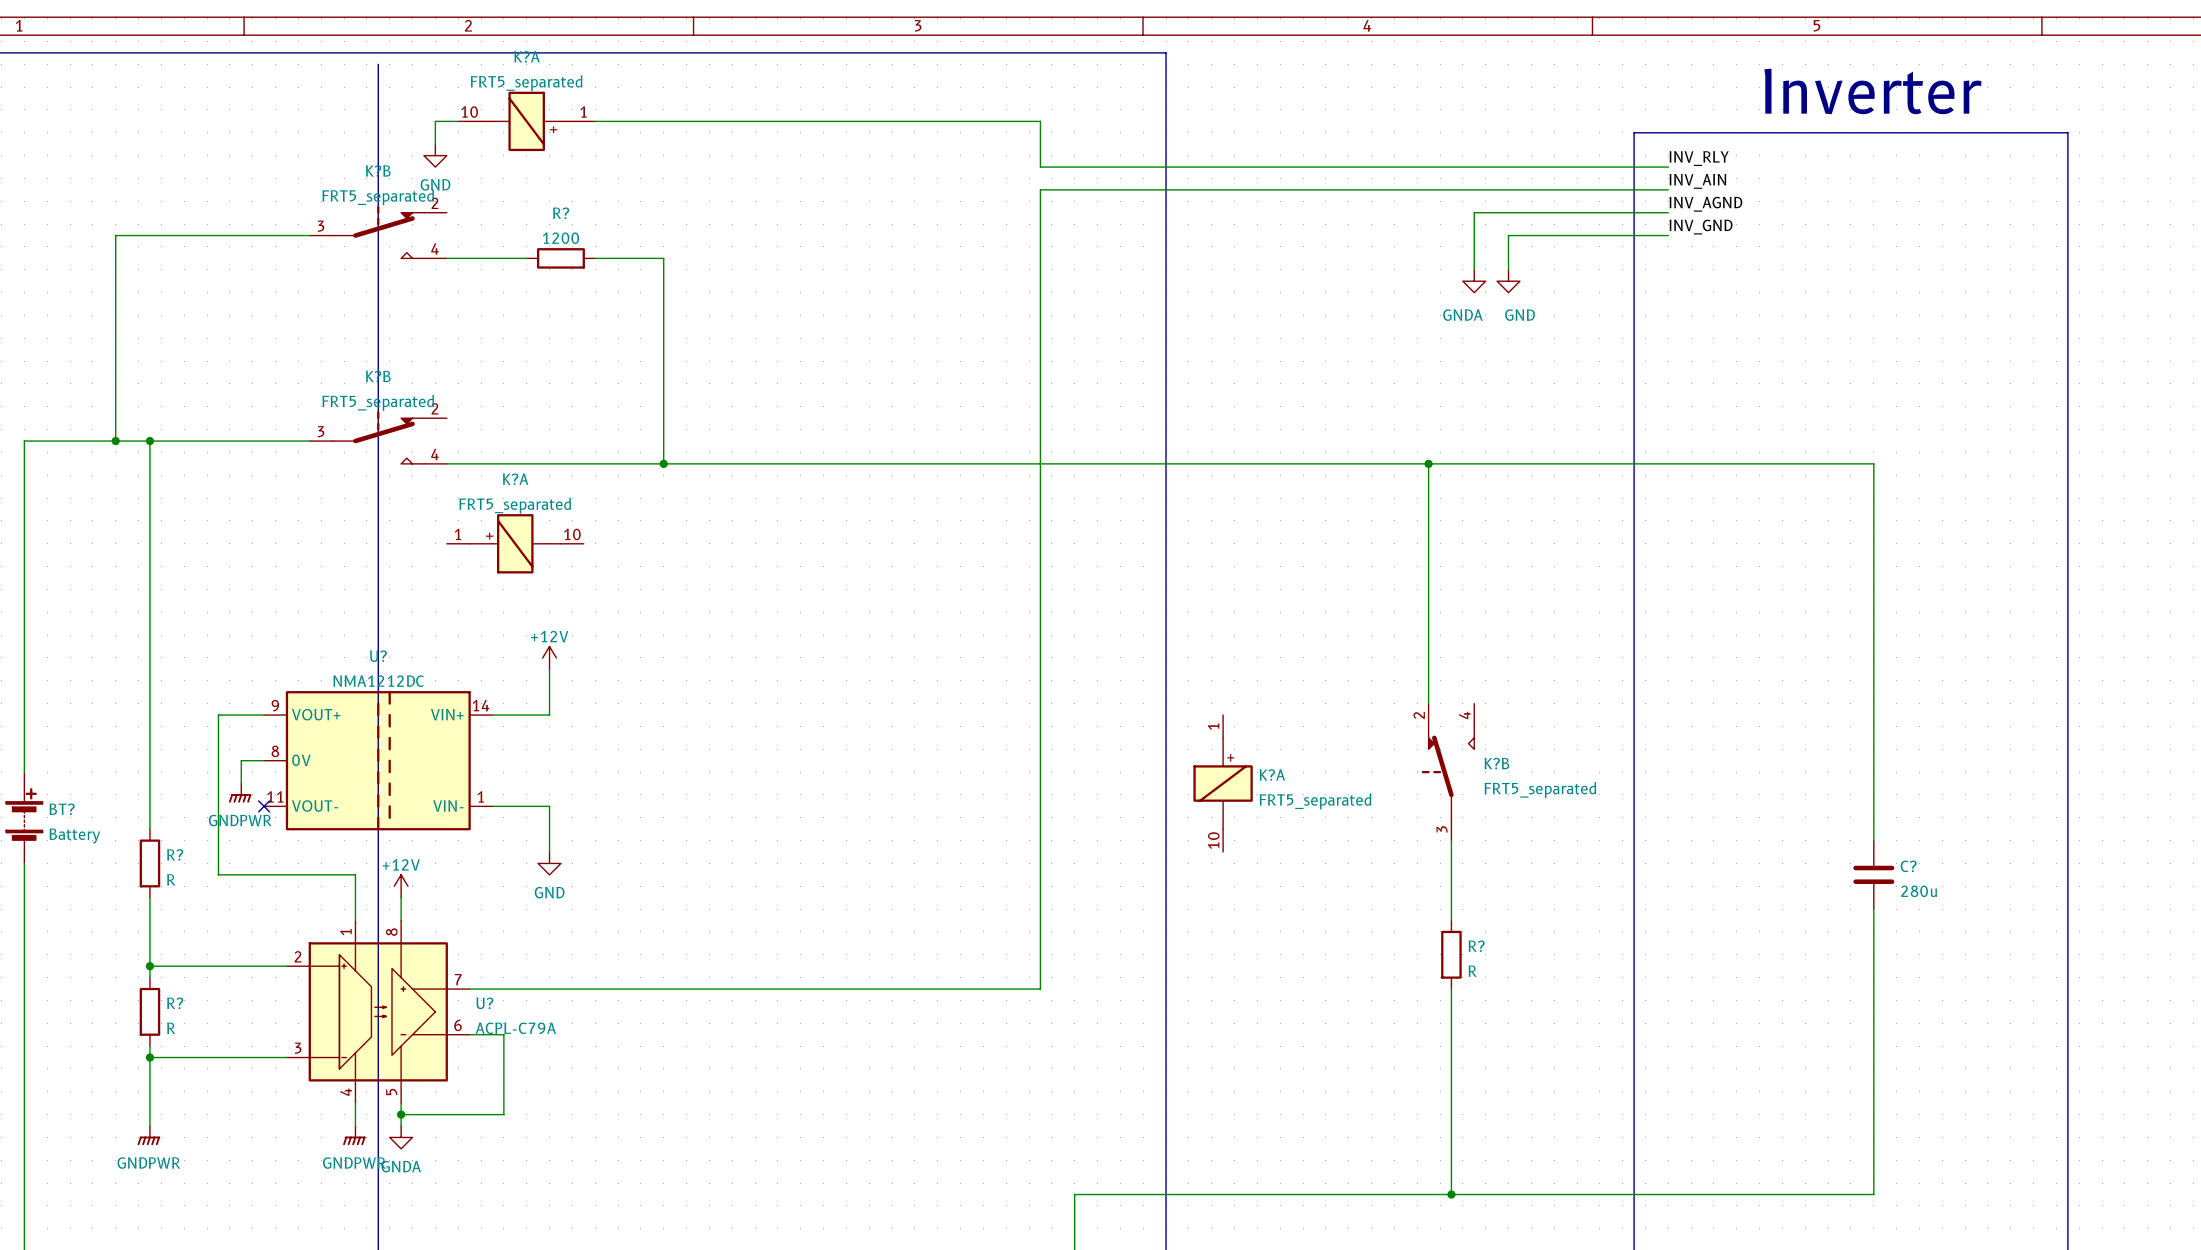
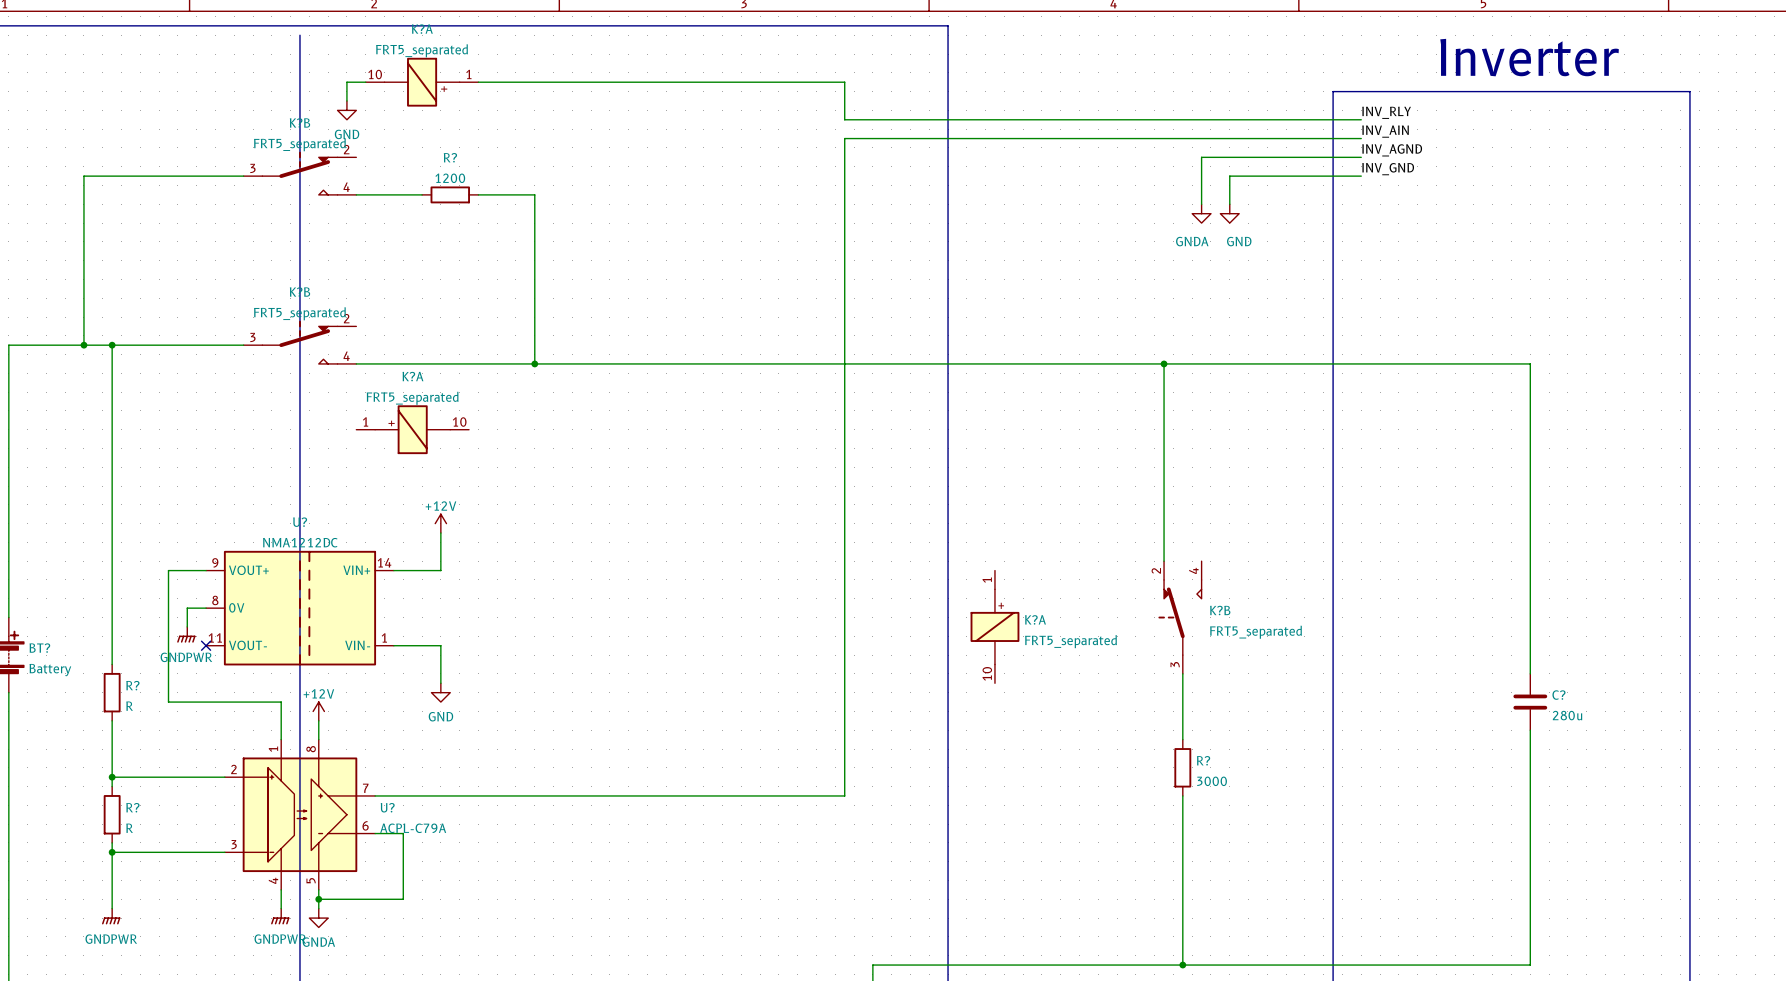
R? value: R (1472, 971) -> 3000 (1212, 781)

